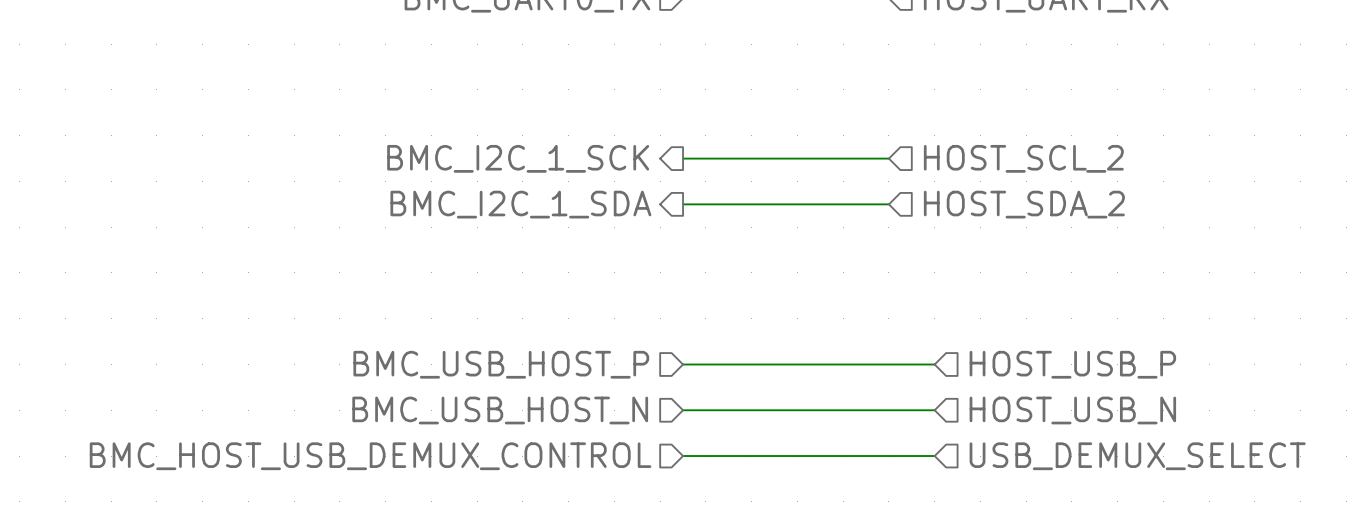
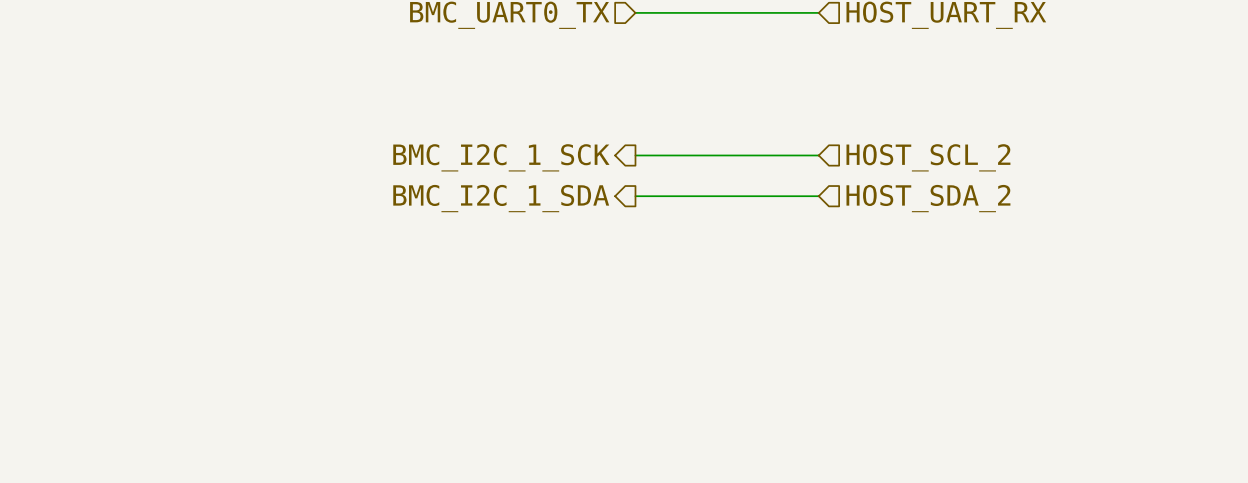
hierarchical label: BMC_USB_HOST_P (501, 364) -> none
wire: (683, 364) (934, 364) -> none
hierarchical label: HOST_USB_P (1072, 364) -> none
hierarchical label: BMC_USB_HOST_N (500, 410) -> none
wire: (683, 410) (934, 410) -> none
hierarchical label: HOST_USB_N (1072, 410) -> none
hierarchical label: BMC_HOST_USB_DEMUX_CONTROL (370, 456) -> none
wire: (683, 456) (934, 456) -> none
hierarchical label: USB_DEMUX_SELECT (1137, 456) -> none

